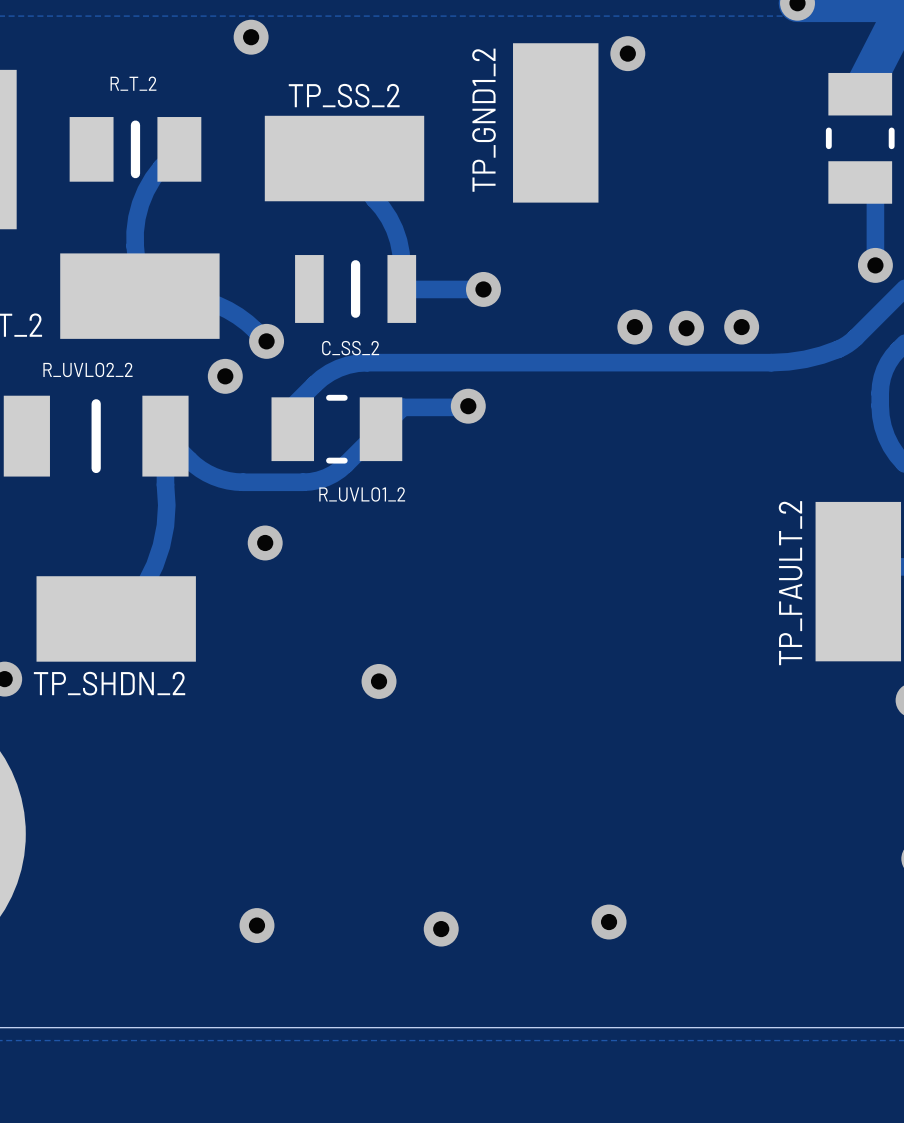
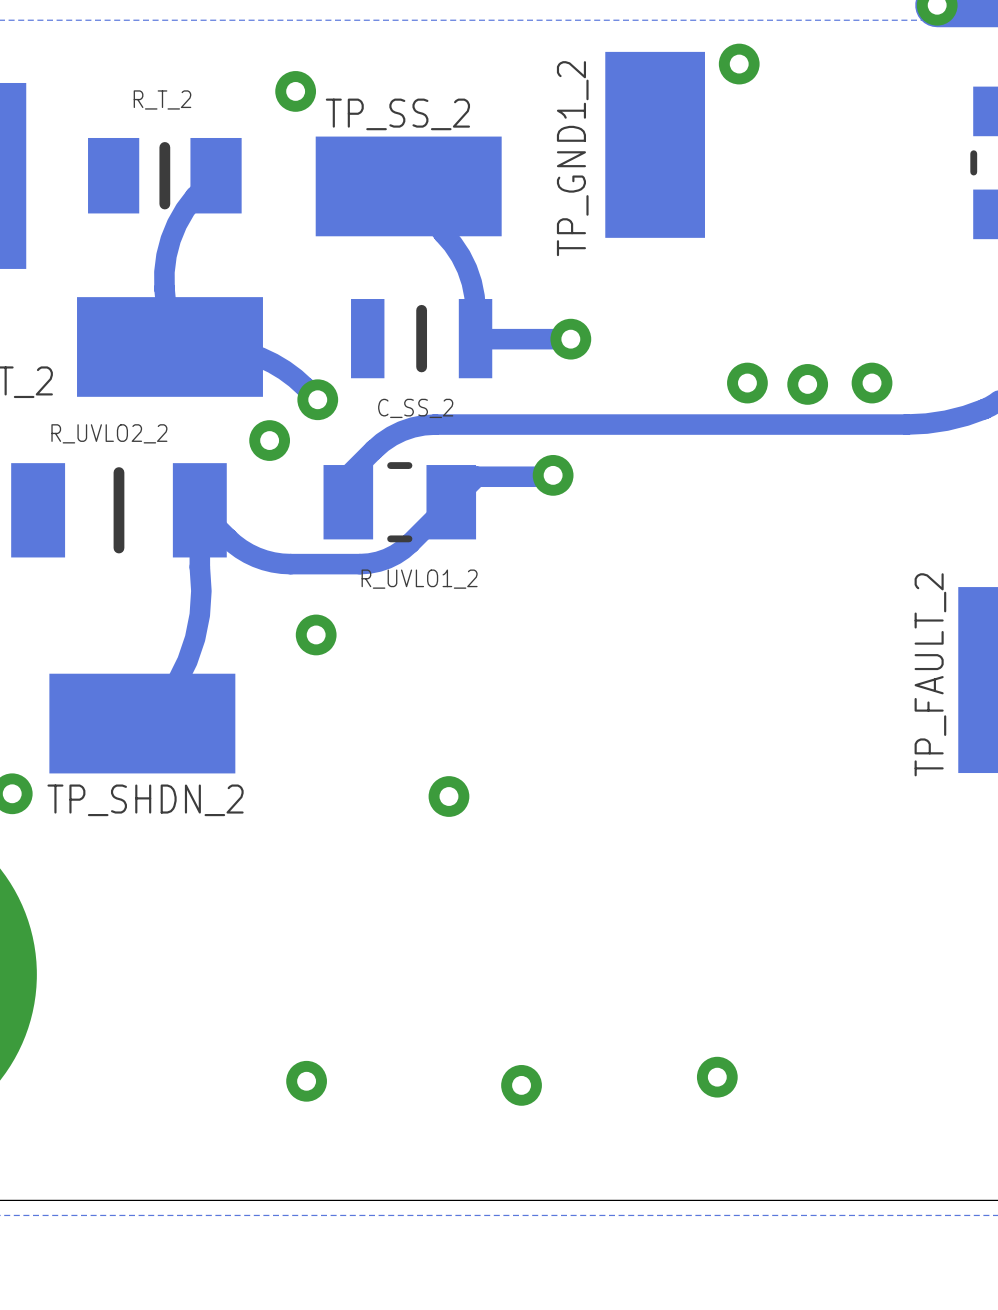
via position: (251, 37) -> (295, 91)

